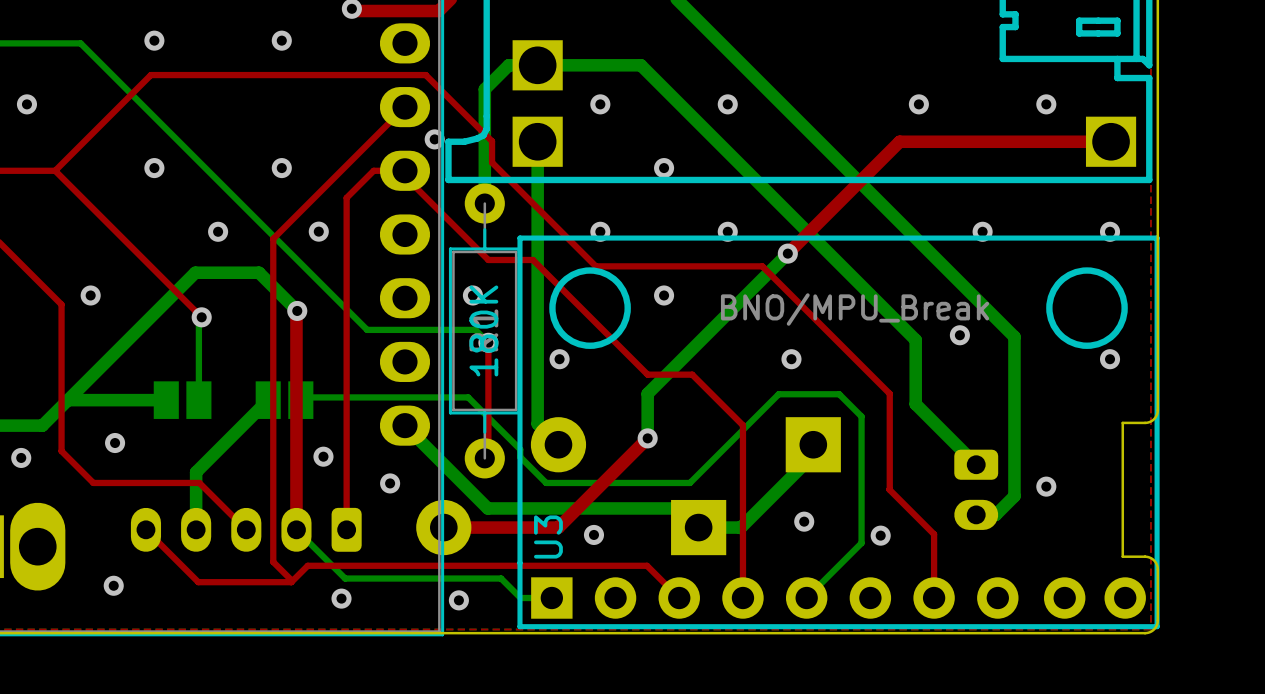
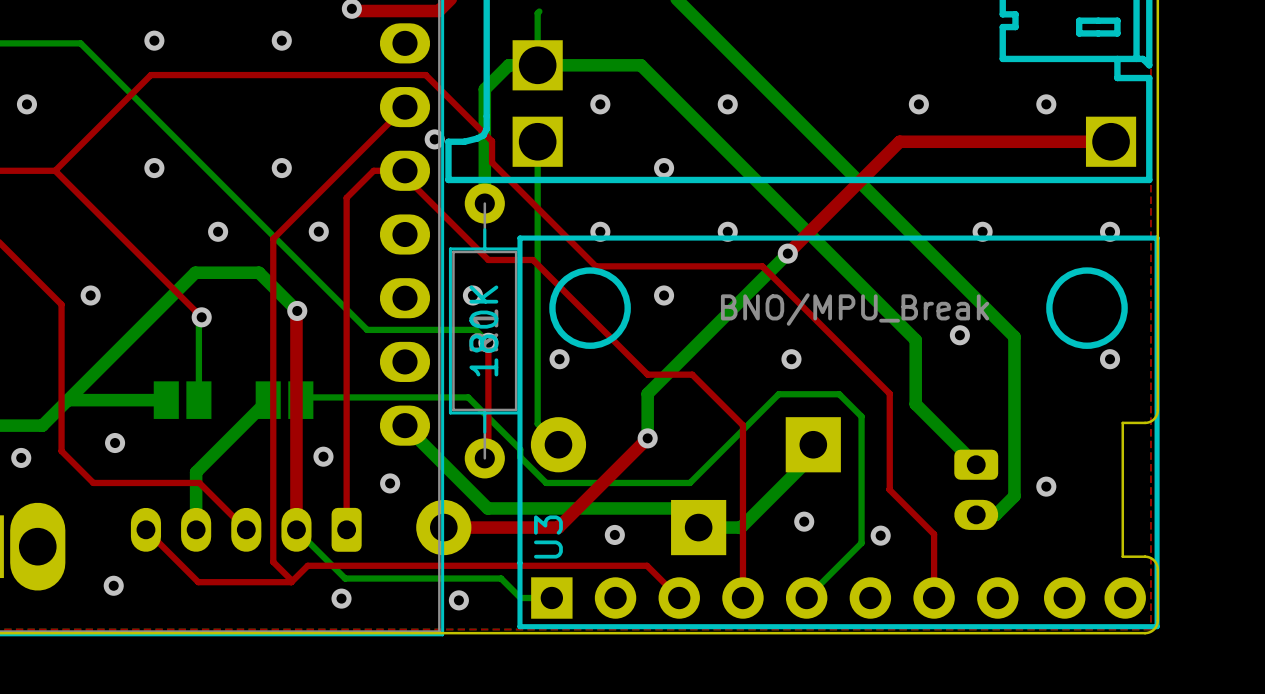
bottom track: none -> (539, 11) (537, 13) (537, 65)
bottom track width: thick (537, 141) (537, 423) (558, 444) -> thin (537, 141) (537, 423) (558, 444)
via position: (593, 534) -> (614, 534)

